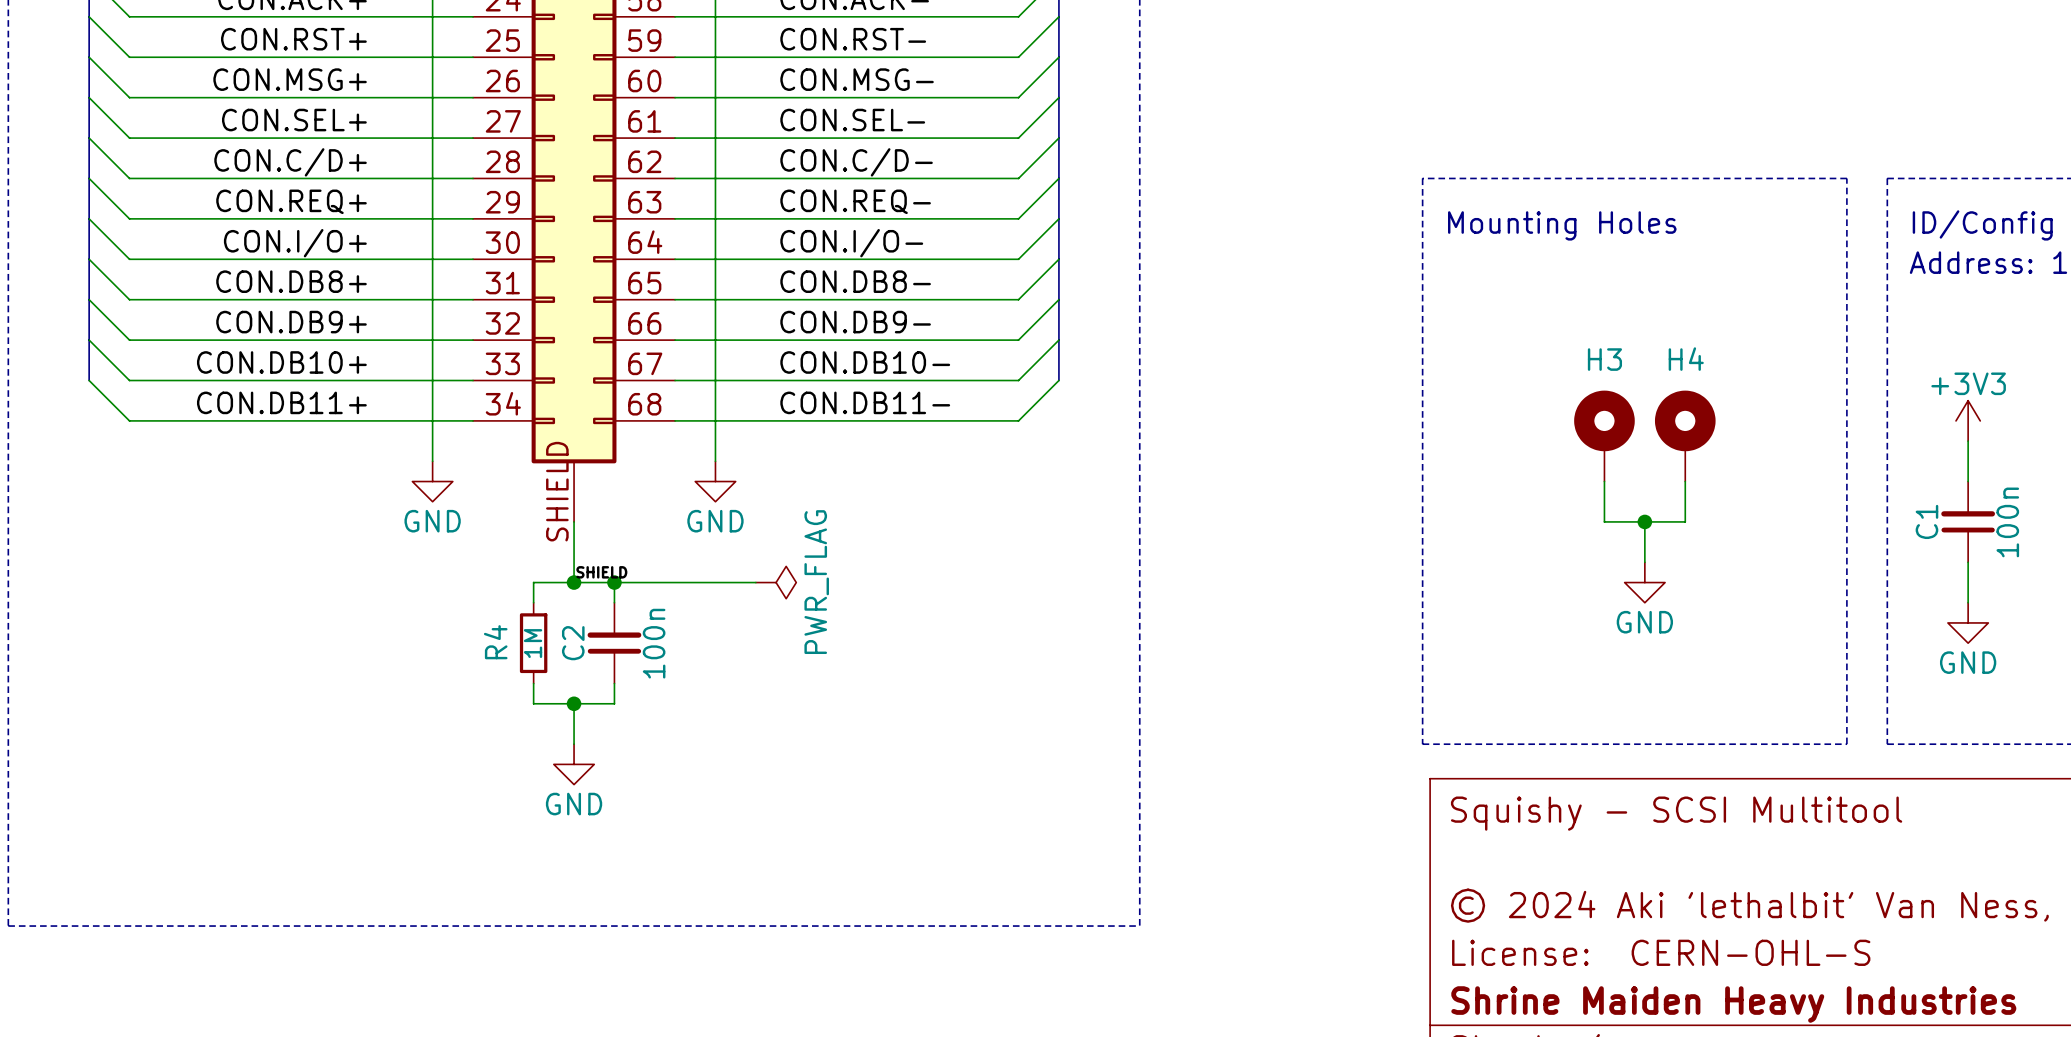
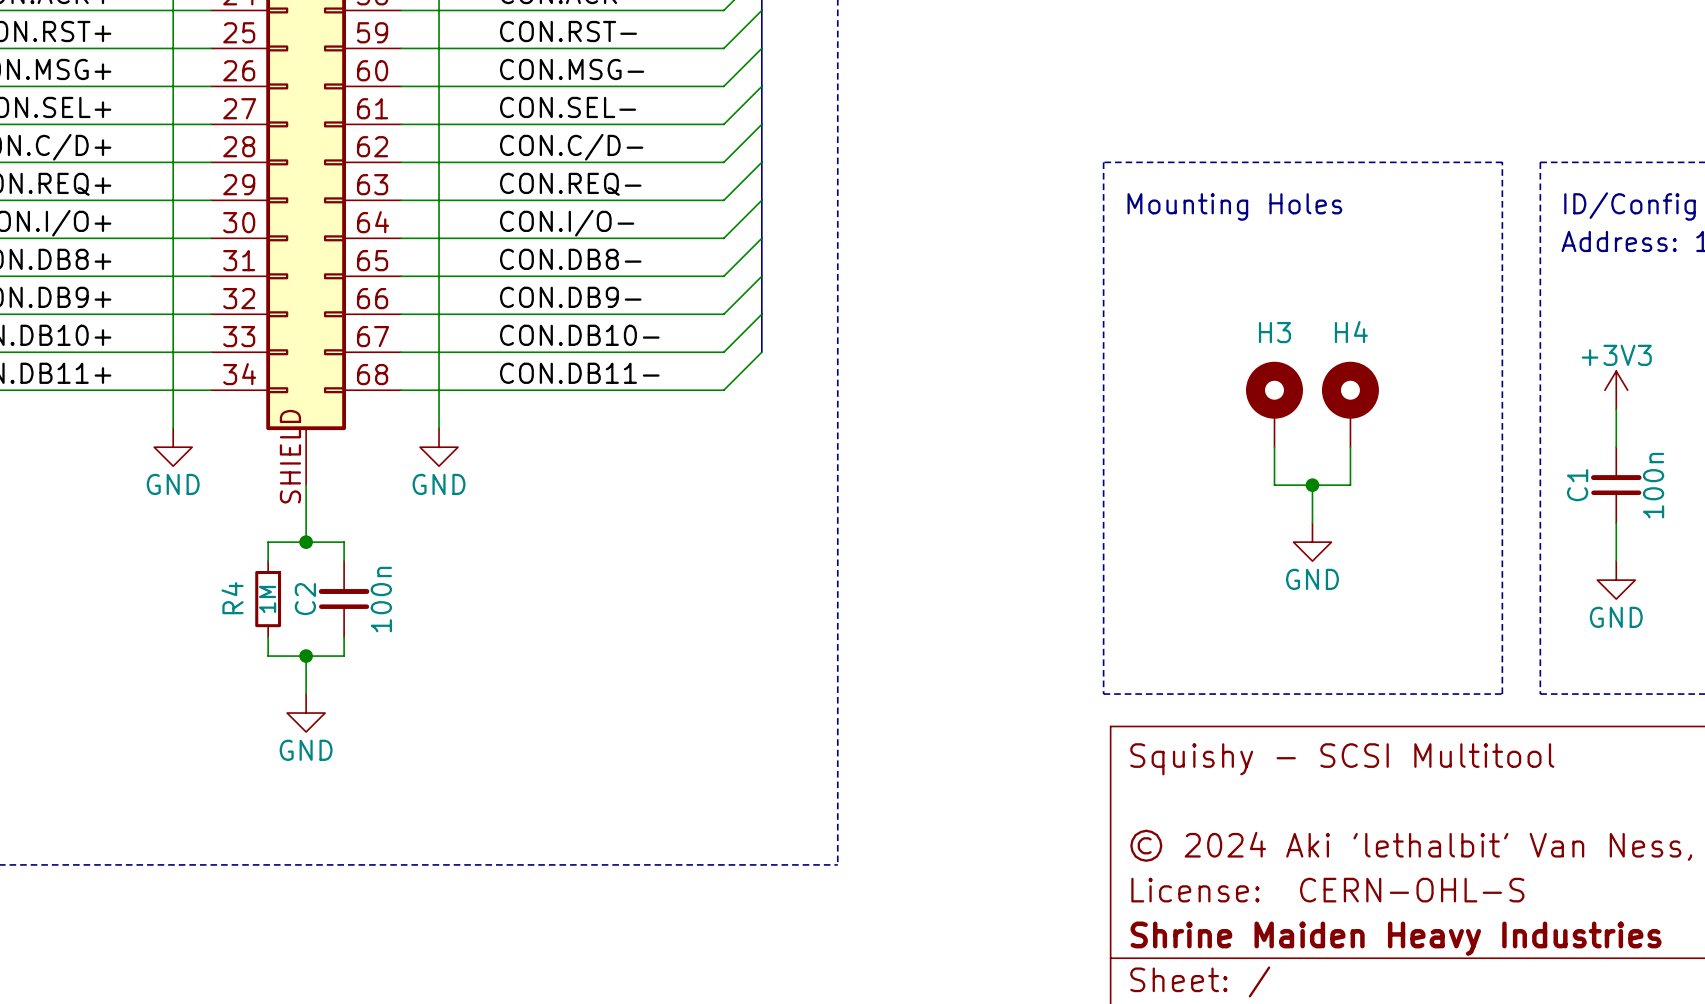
label: SHIELD (601, 572) -> none
wire: (614, 582) (755, 582) -> none
junction: (614, 582) -> none
power symbol: PWR_FLAG (776, 582) -> none

